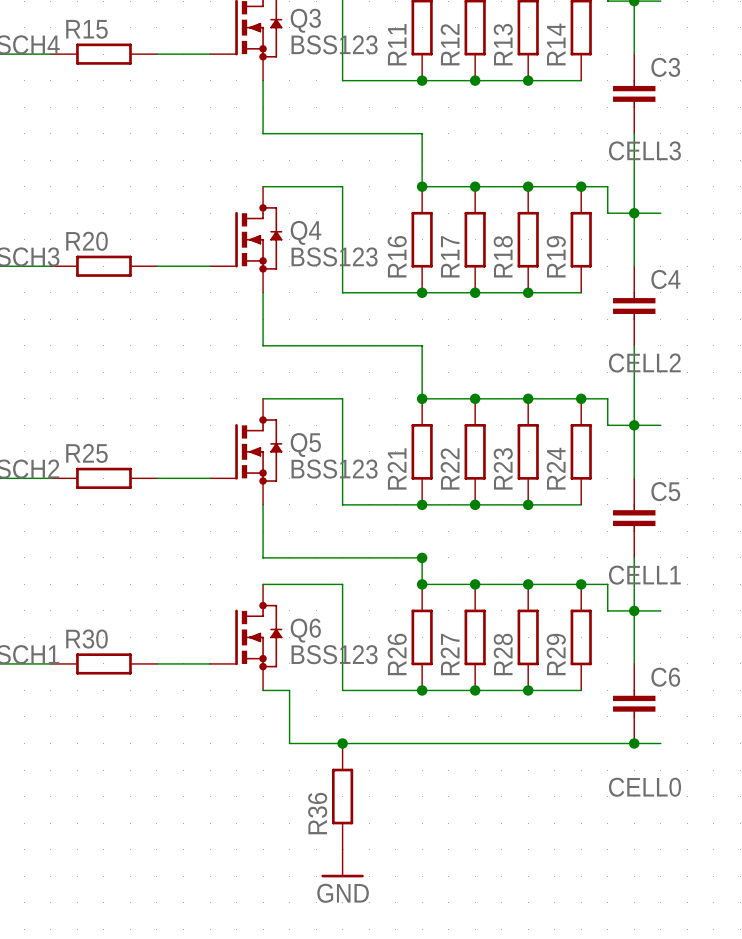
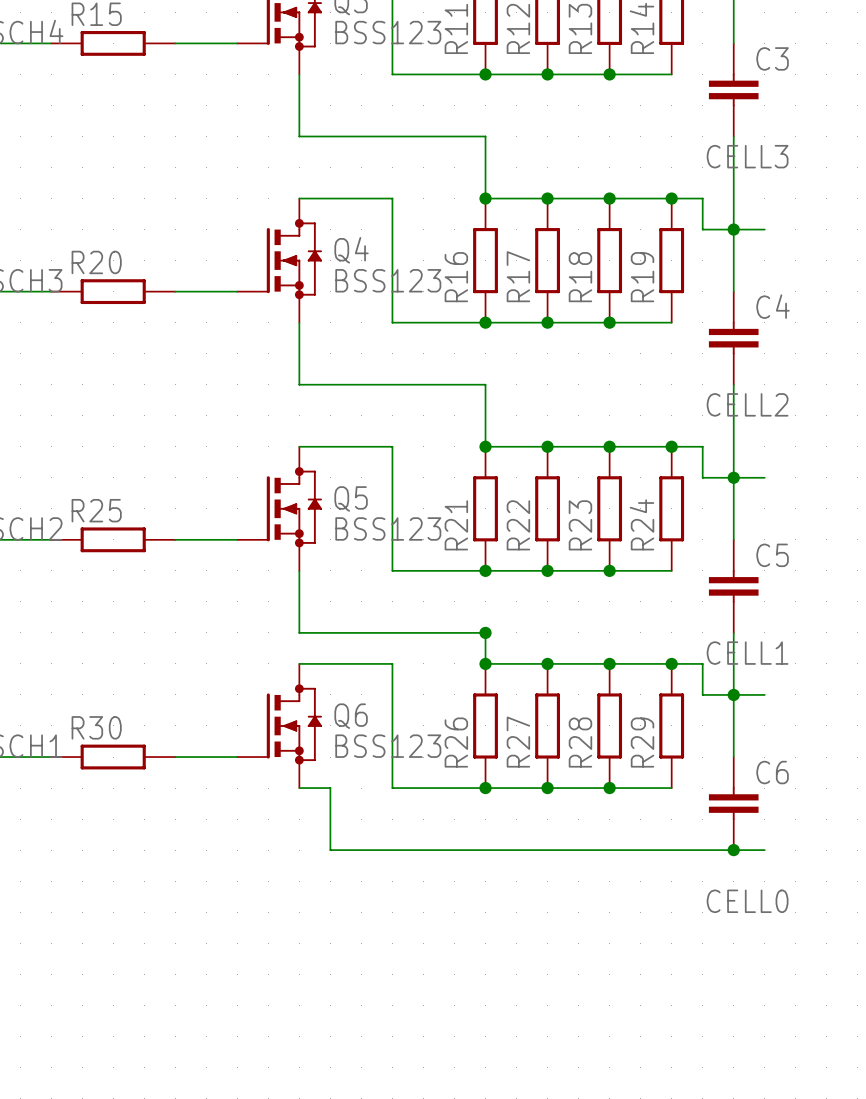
junction: (342, 743) -> none
R36: (342, 796) -> none
power symbol: GND (342, 863) -> none

